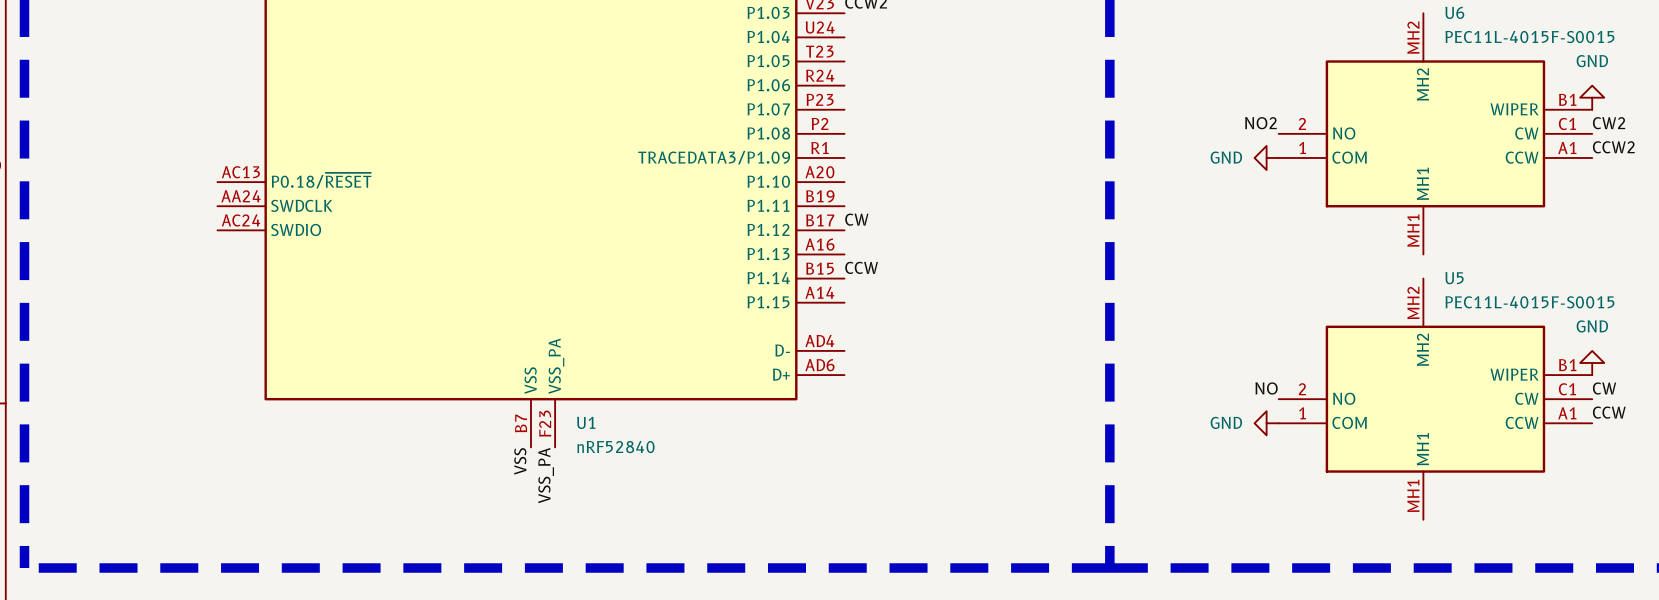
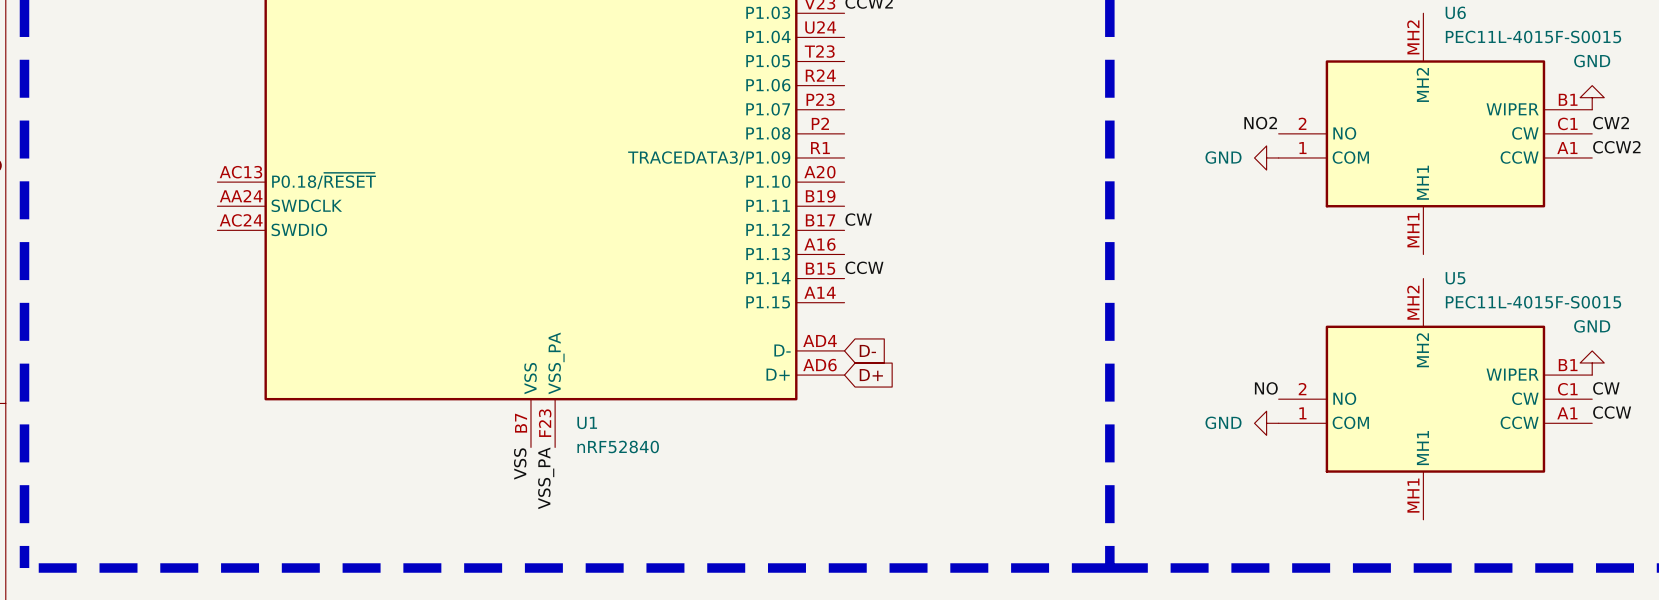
global label: none -> D- (867, 350)
global label: none -> D+ (871, 375)

